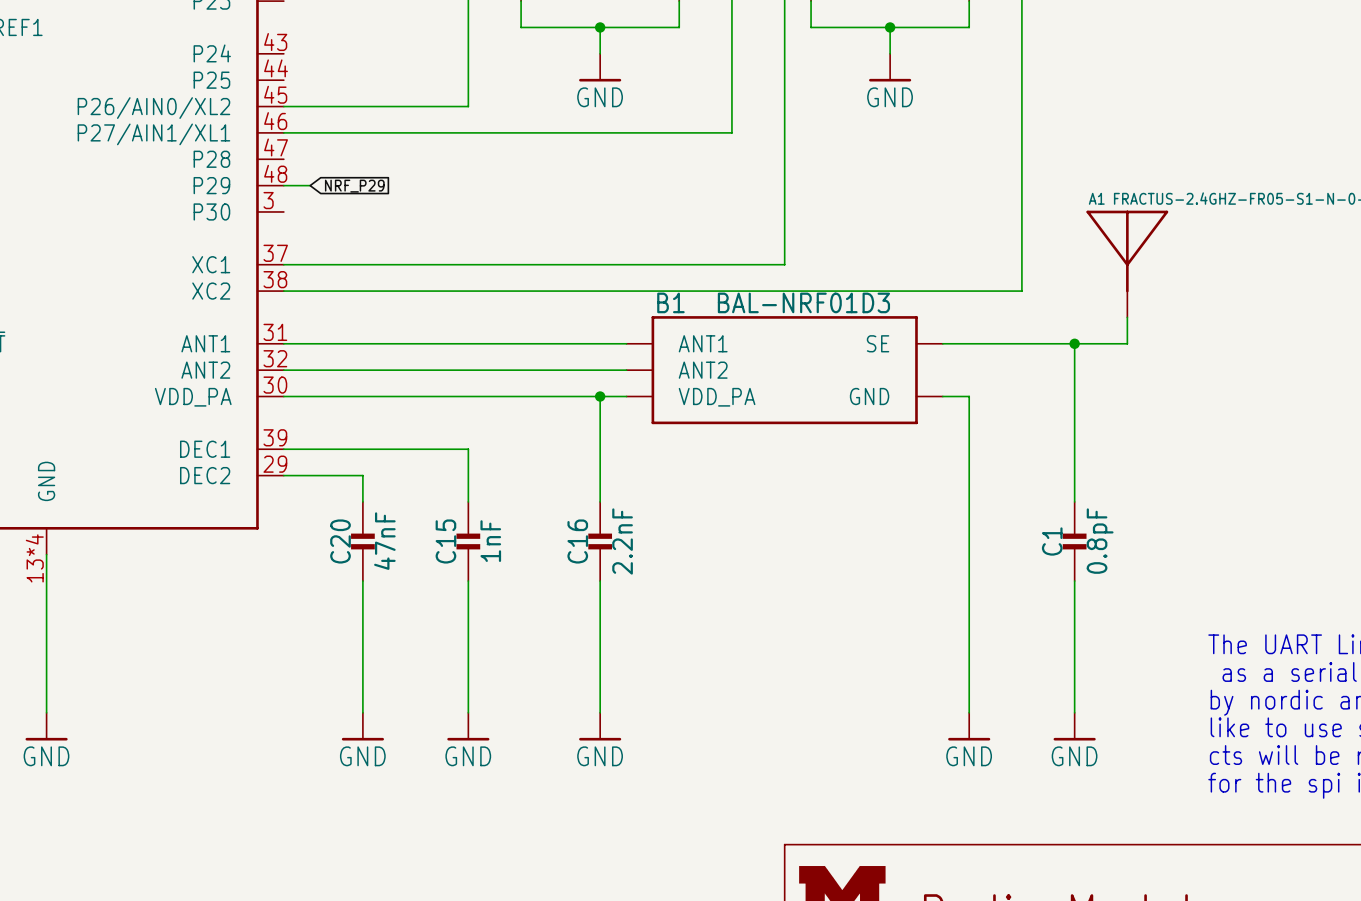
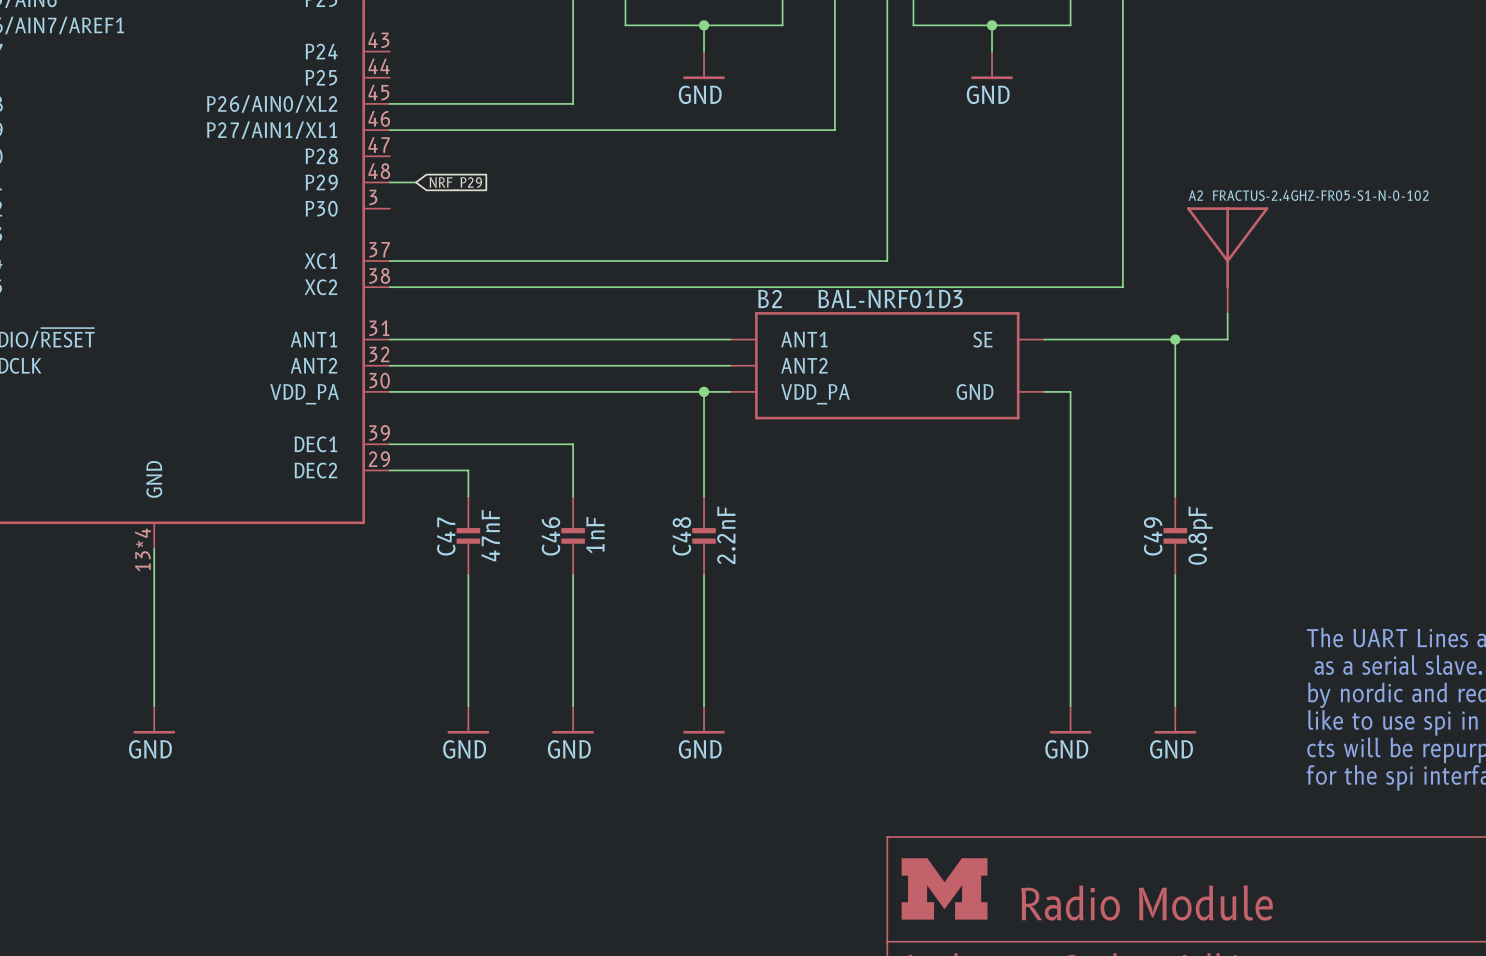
A1 name: A1 (1096, 198) -> A2 (1195, 195)
B1 name: B1 (670, 302) -> B2 (770, 298)
C20 name: C20 (340, 541) -> C47 (446, 536)
C15 name: C15 (445, 541) -> C46 (550, 536)
C16 name: C16 (577, 541) -> C48 (681, 536)
C1 name: C1 (1052, 541) -> C49 (1153, 536)

